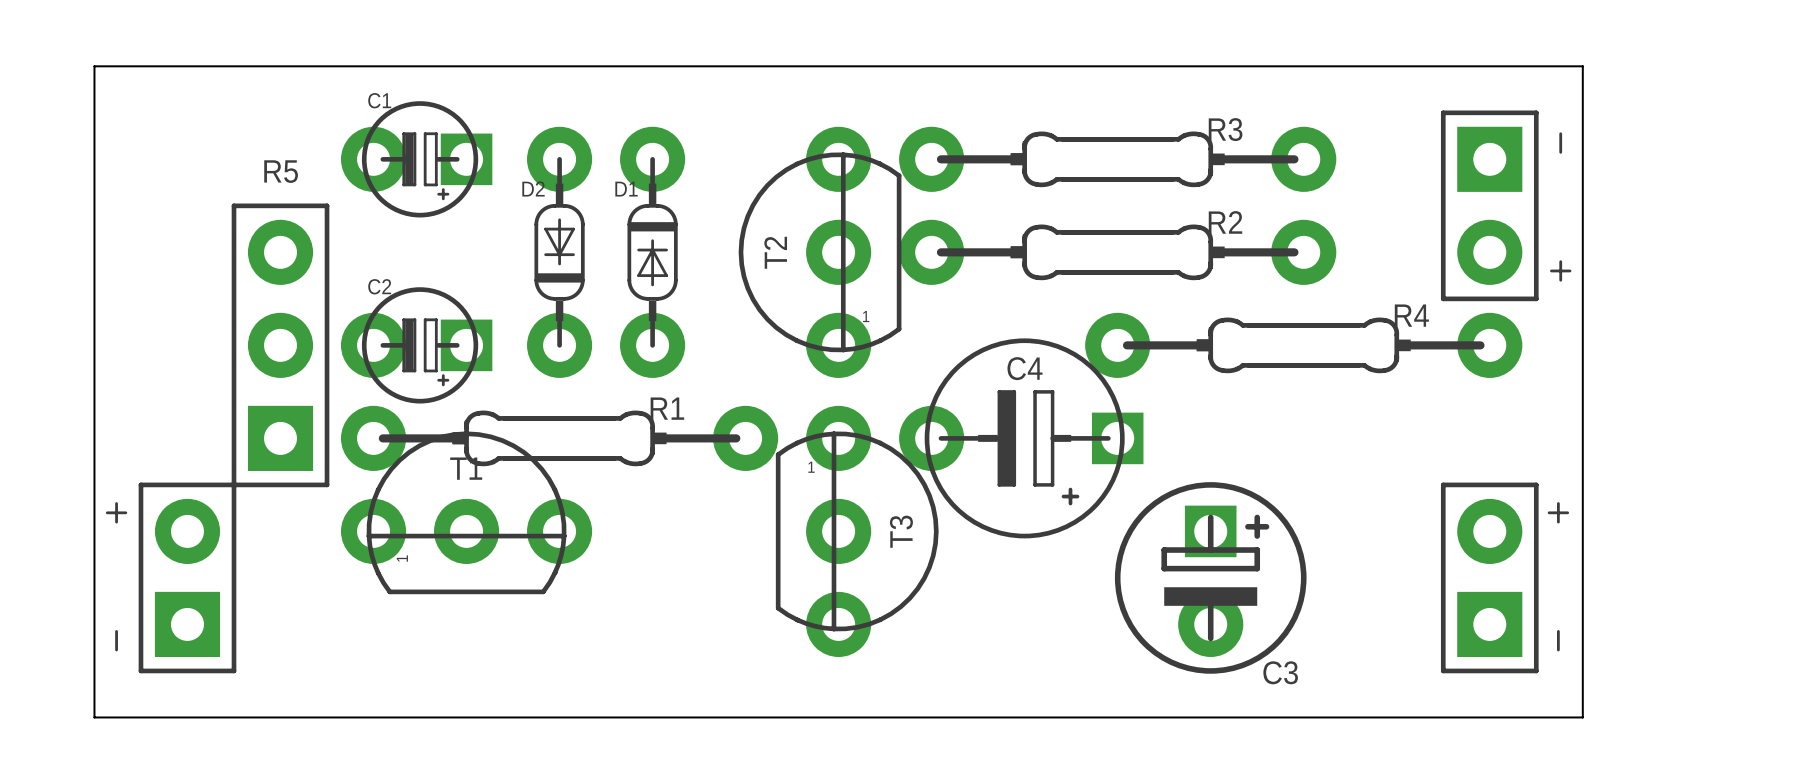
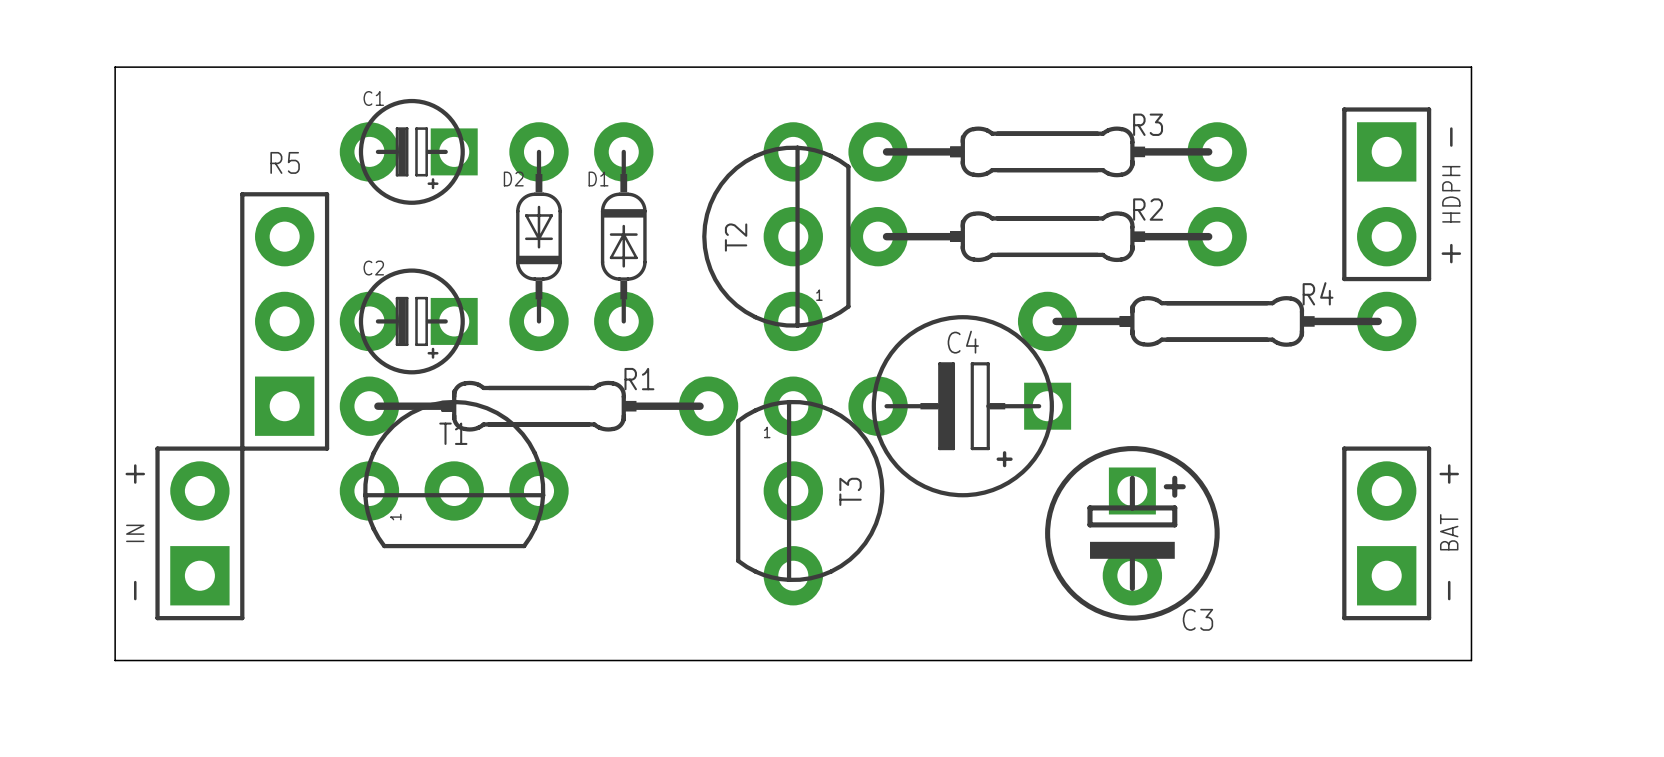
HDPH name: none -> HDPH (1451, 194)
IN name: none -> IN (135, 533)
BAT name: none -> BAT (1449, 532)

